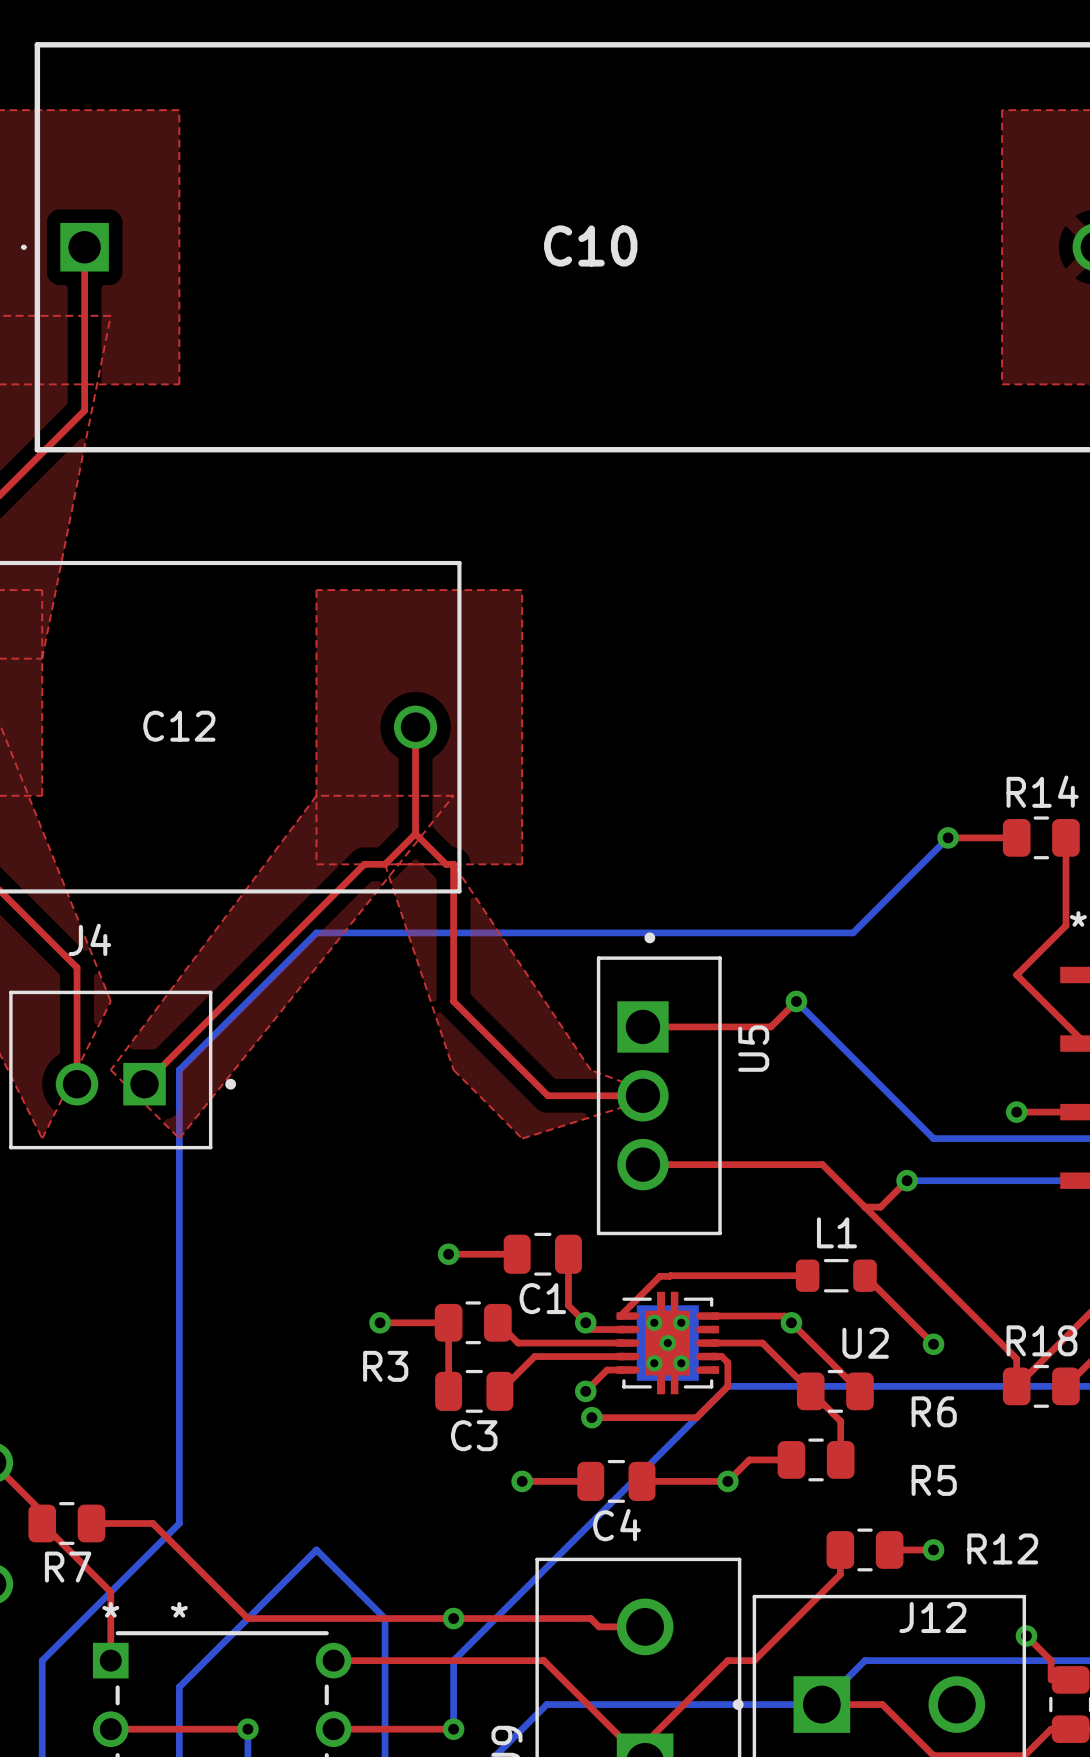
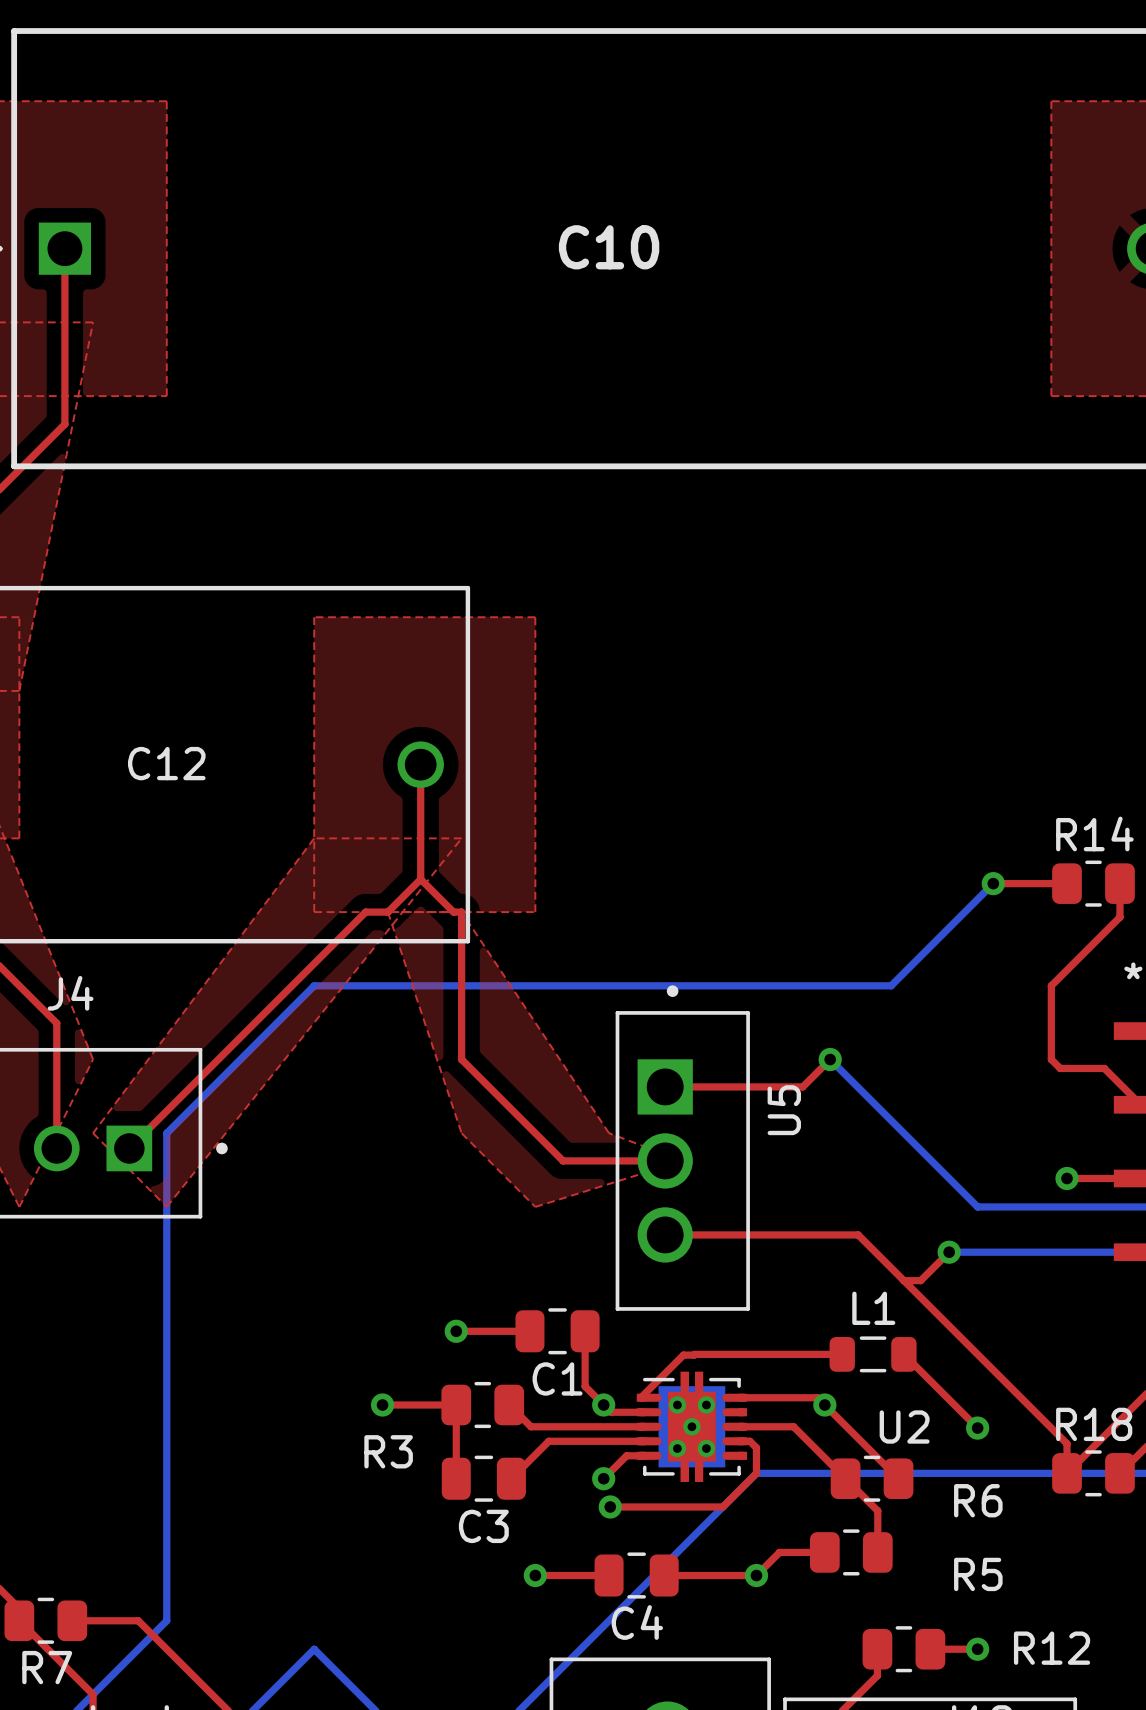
top track: (1065, 869) (1065, 925) (1016, 974) (1051, 1009) -> (1119, 917) (1051, 985) (1051, 1059) (1060, 1068) (1104, 1068)

